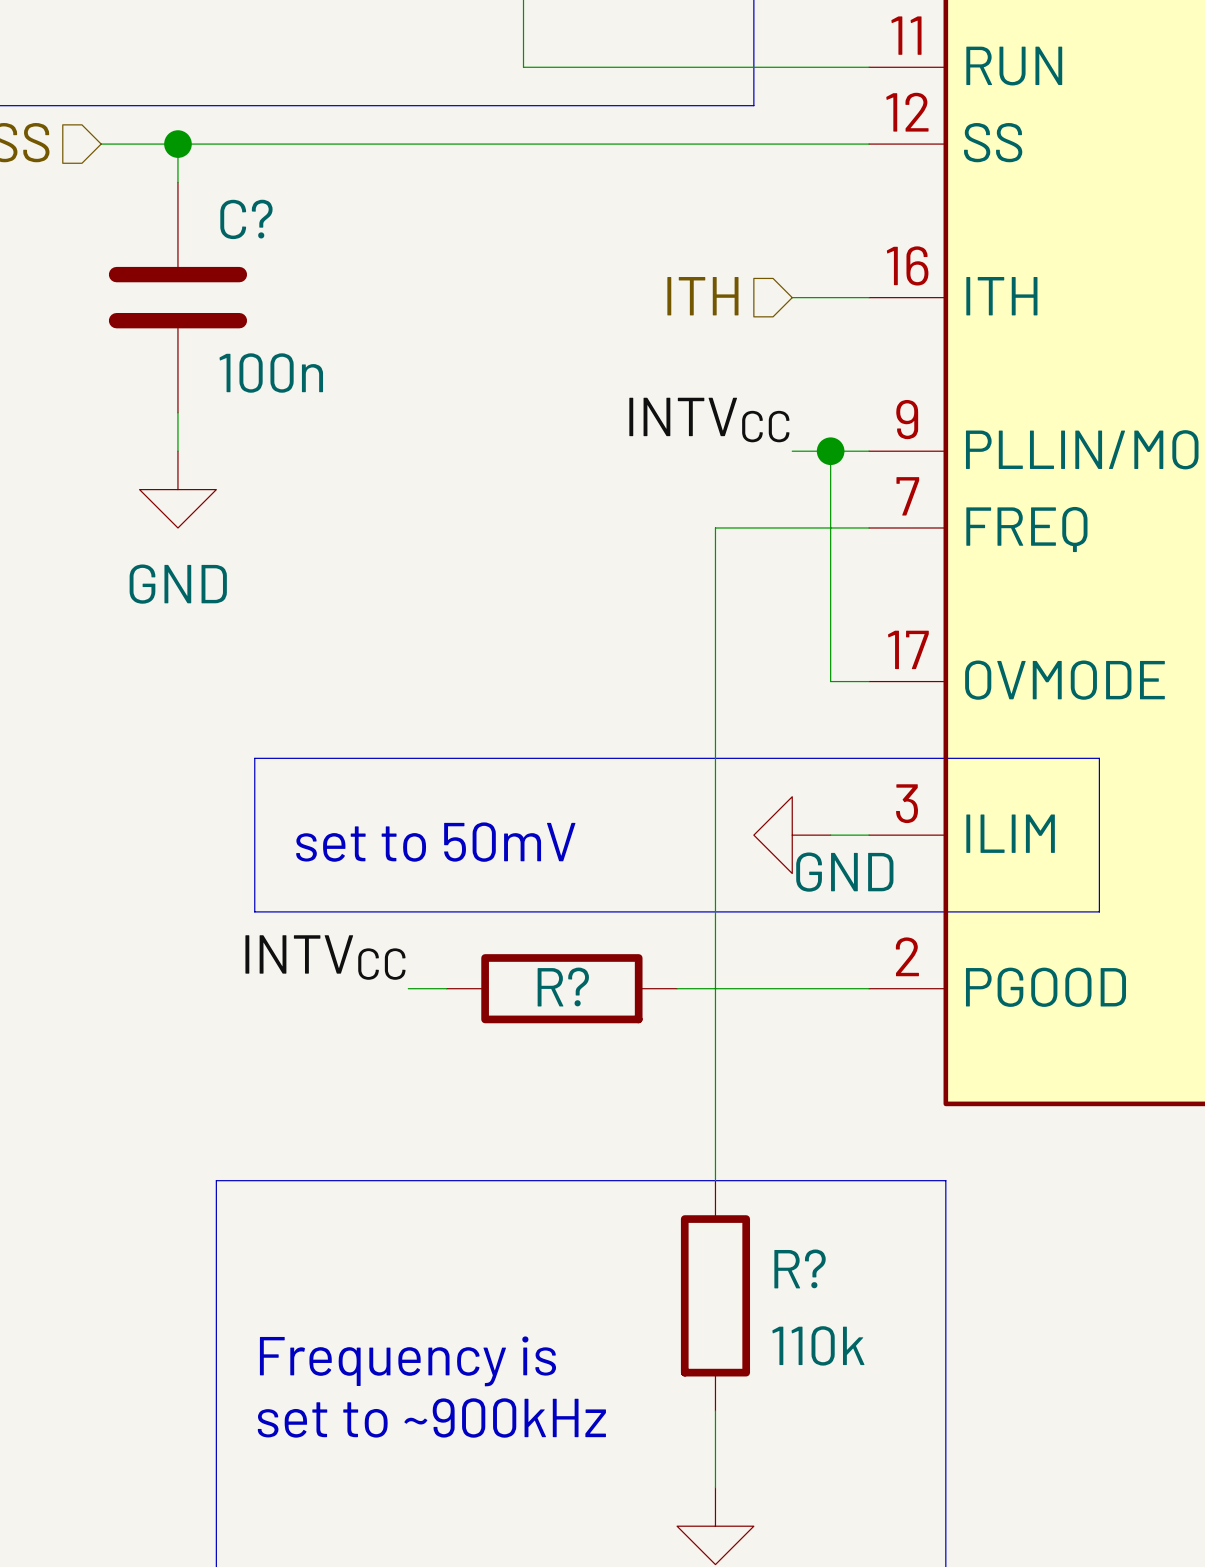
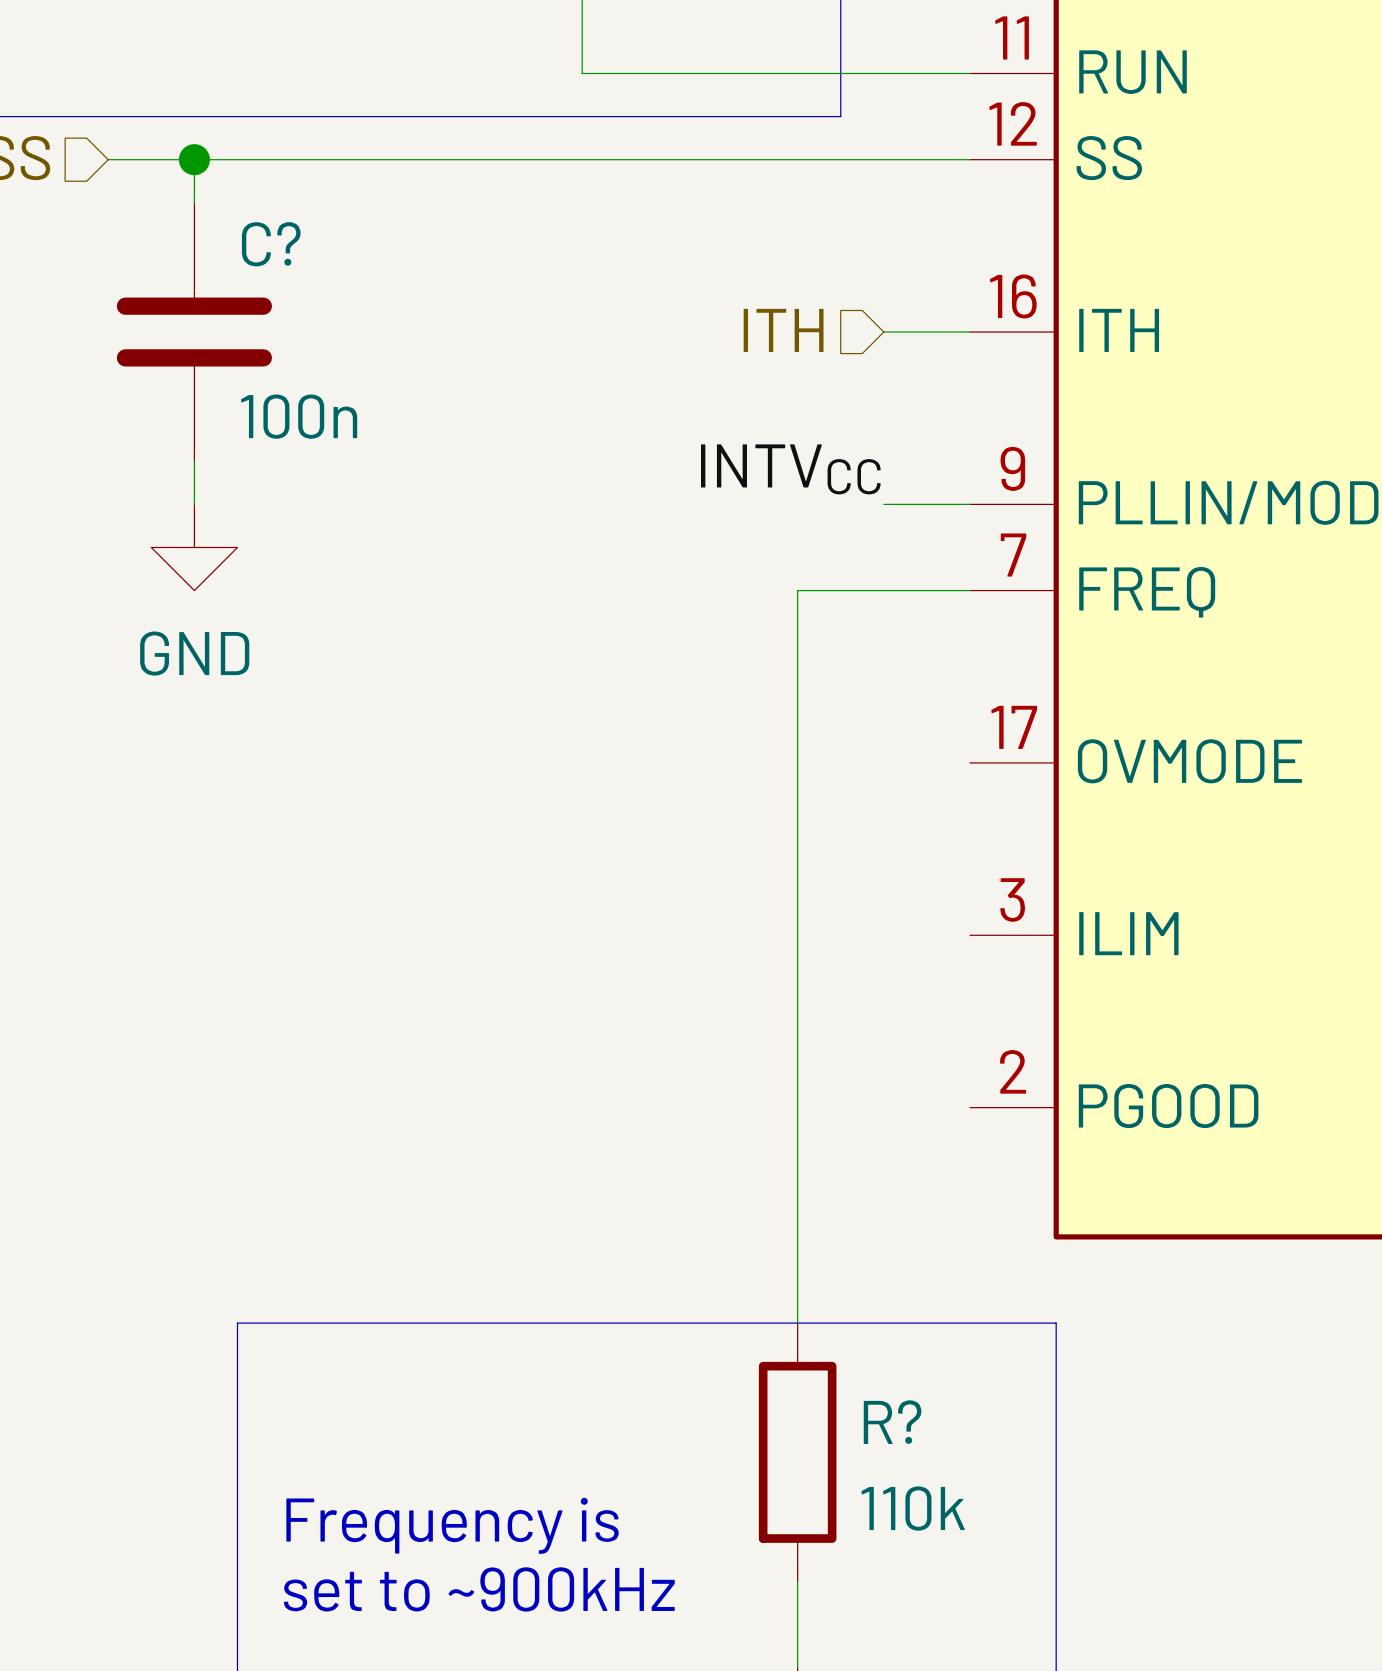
wire: (830, 451) (830, 681) (869, 681) -> none
junction: (830, 451) -> none
line: (254, 758) (254, 911) (1099, 911) (1099, 758) (254, 758) -> none
power symbol: GND (792, 835) -> none
wire: (830, 835) (869, 835) -> none
text: set to 50mV (435, 842) -> none
label: INTVCC (325, 957) -> none
wire: (408, 988) (446, 988) -> none
R?: (561, 988) -> none
wire: (677, 988) (869, 988) -> none

